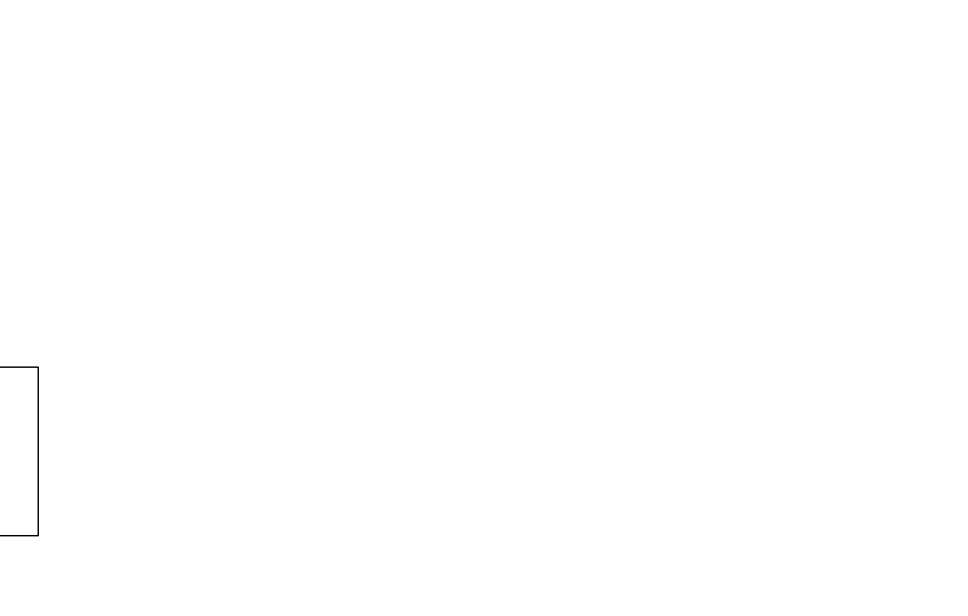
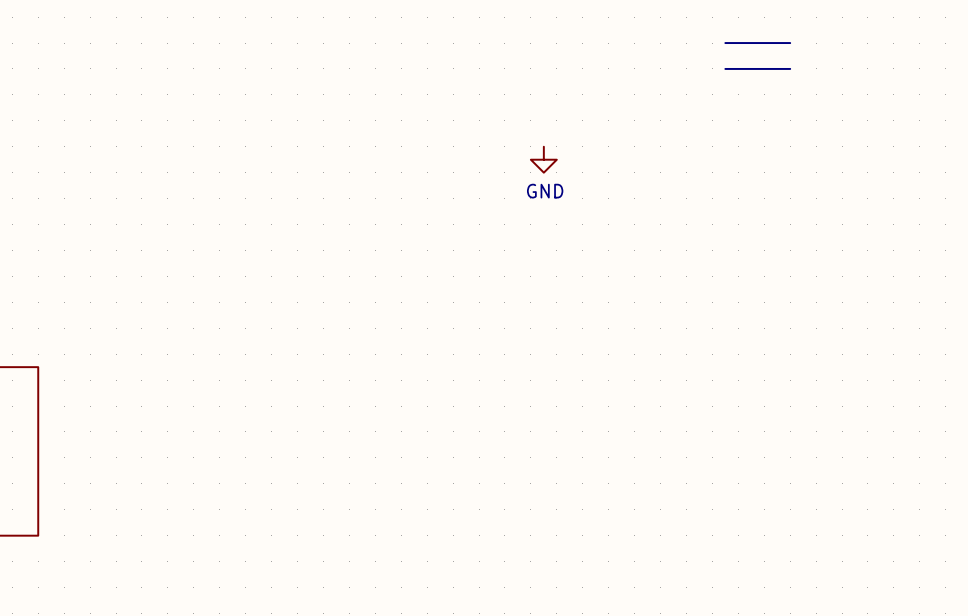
wire: none -> (725, 43) (790, 43)
wire: none -> (725, 68) (790, 68)
power symbol: none -> GND (543, 159)

